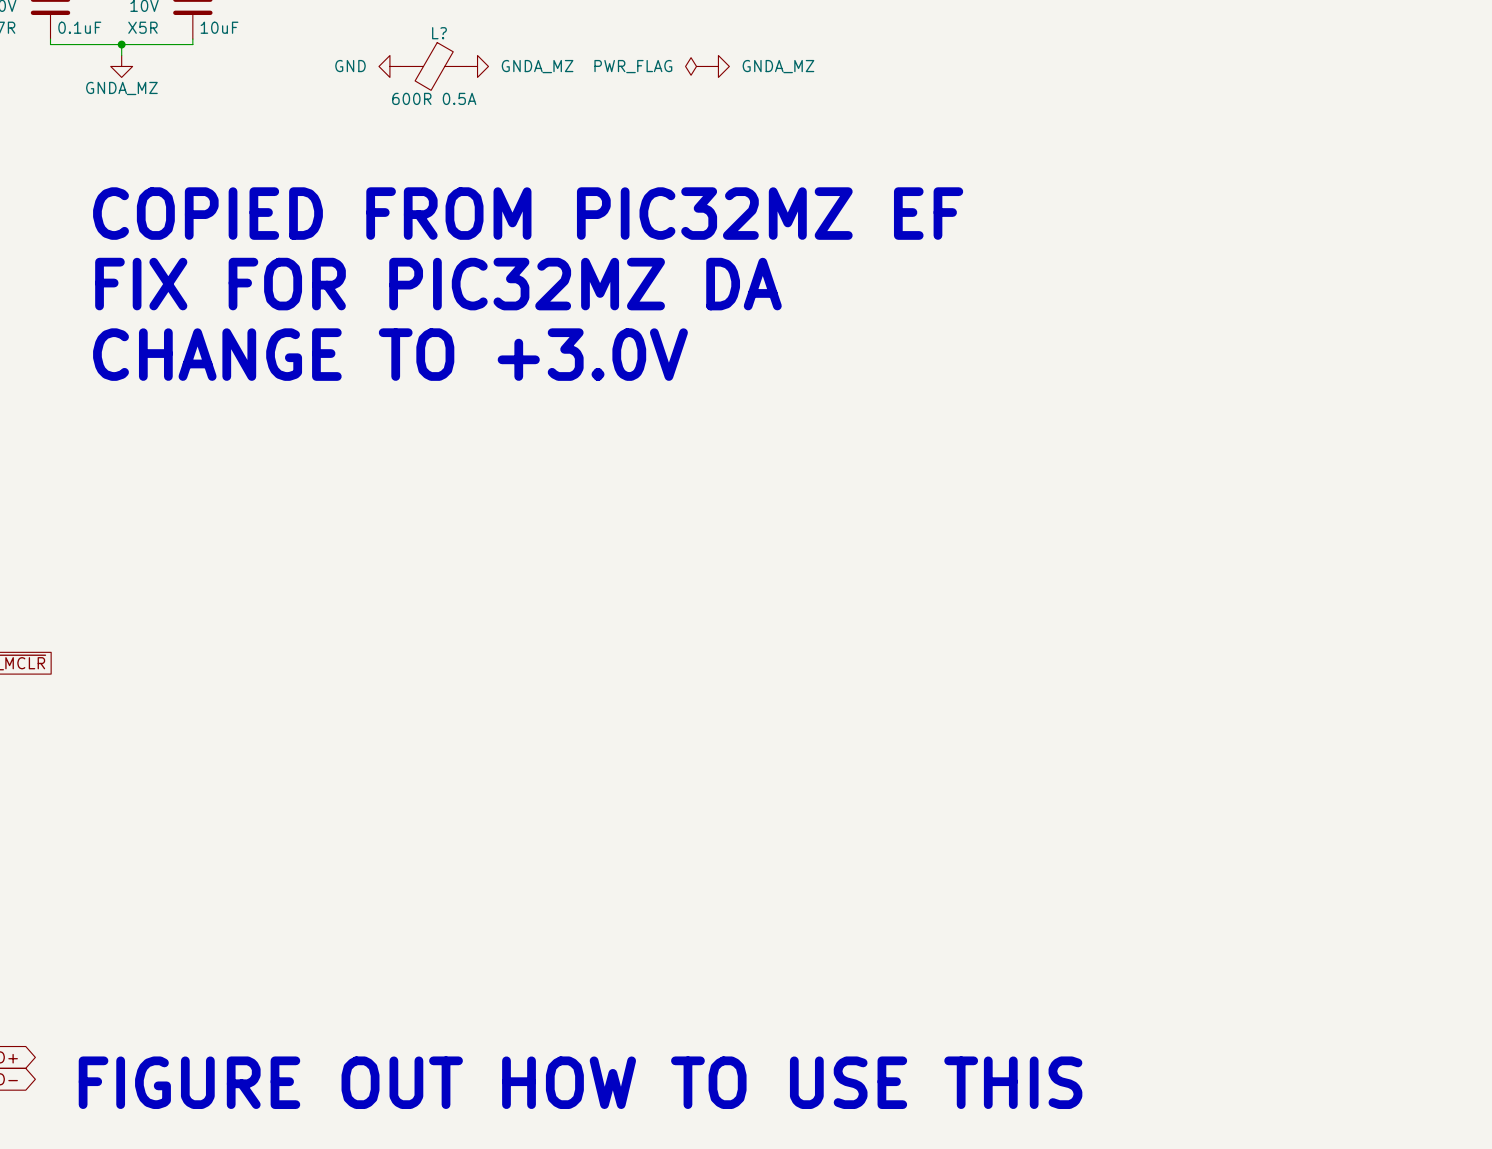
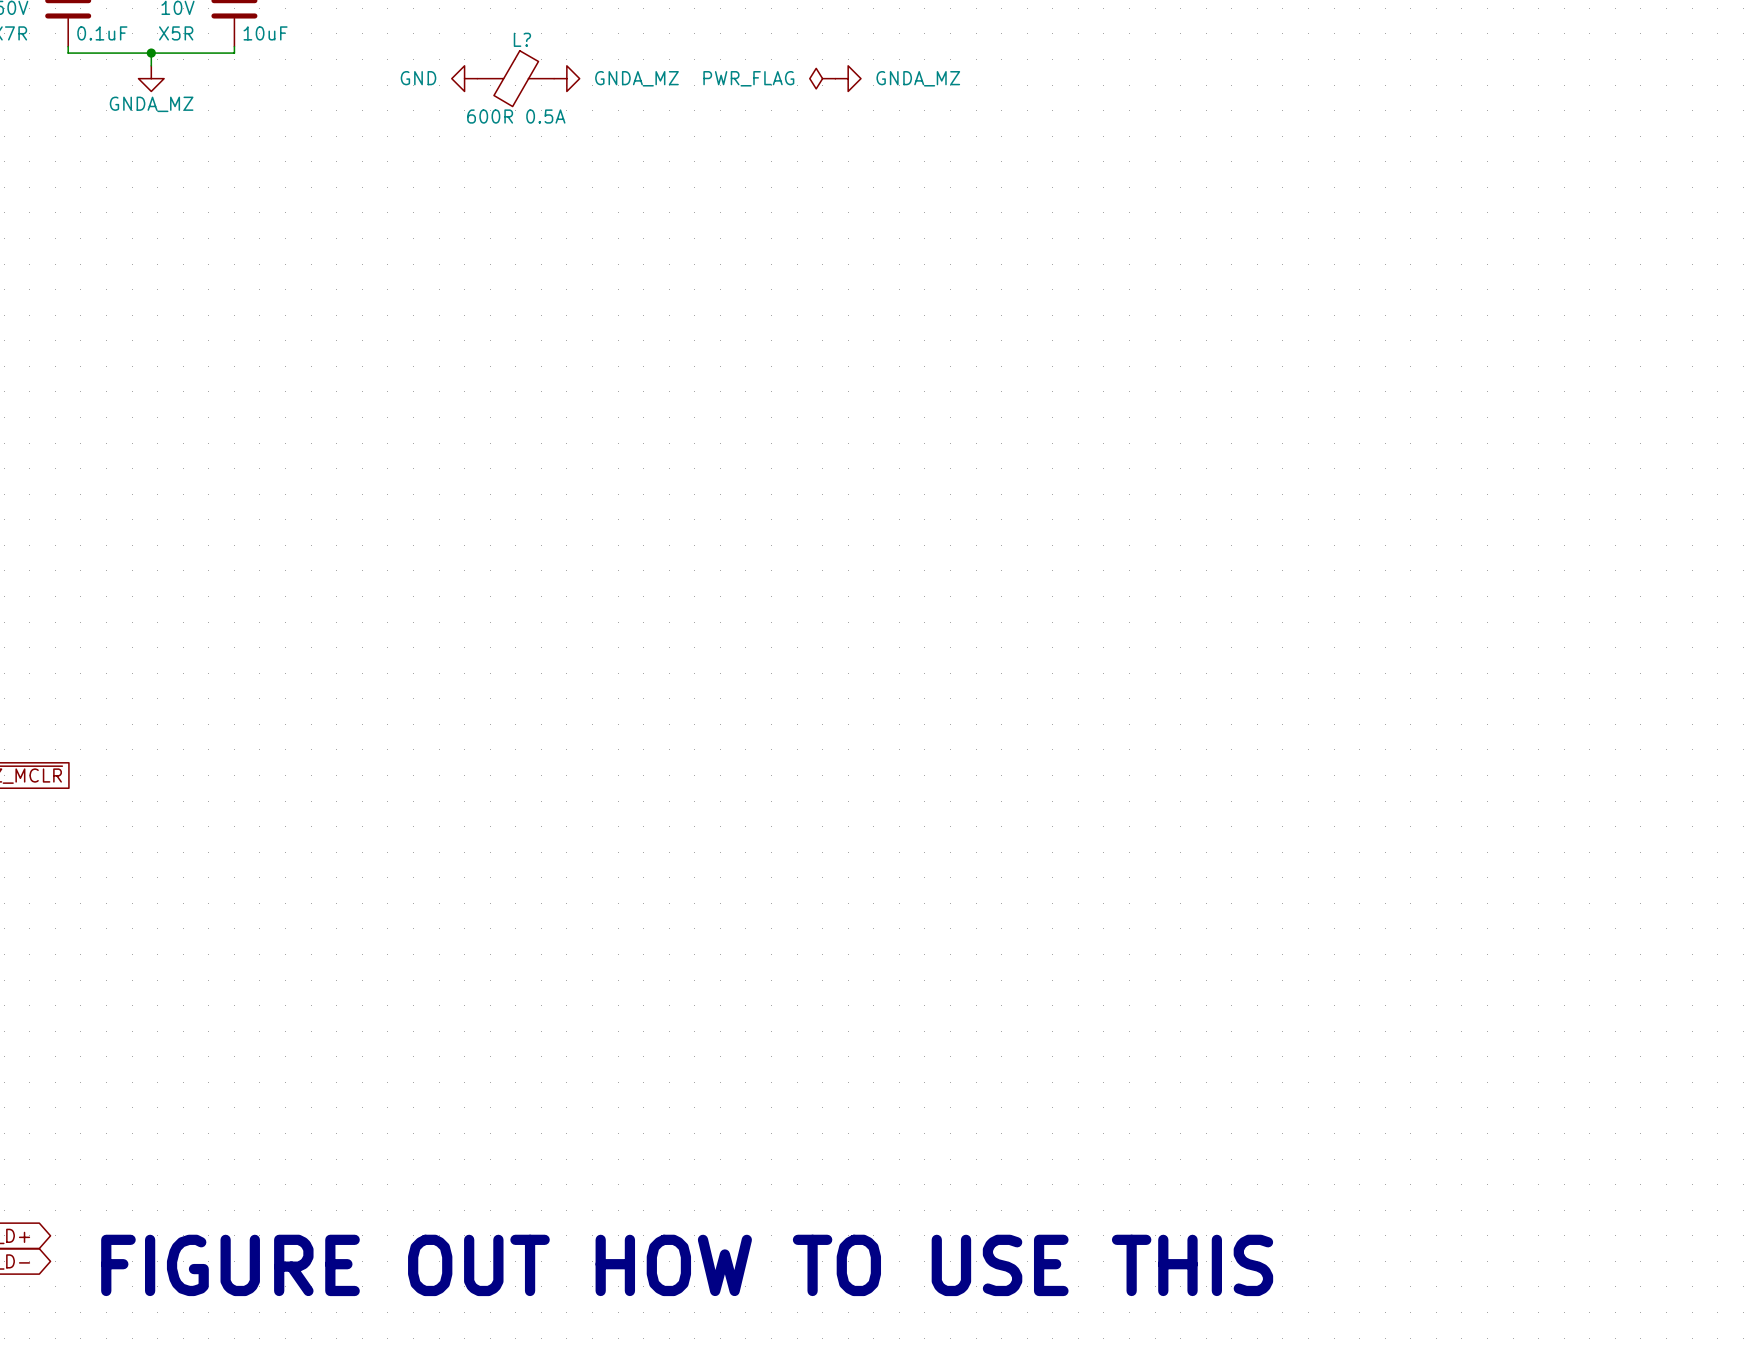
text: COPIED FROM PIC32MZ EF (528, 213) -> none
text: FIX FOR PIC32MZ DA (438, 284) -> none
text: CHANGE TO +3.0V (390, 354) -> none

